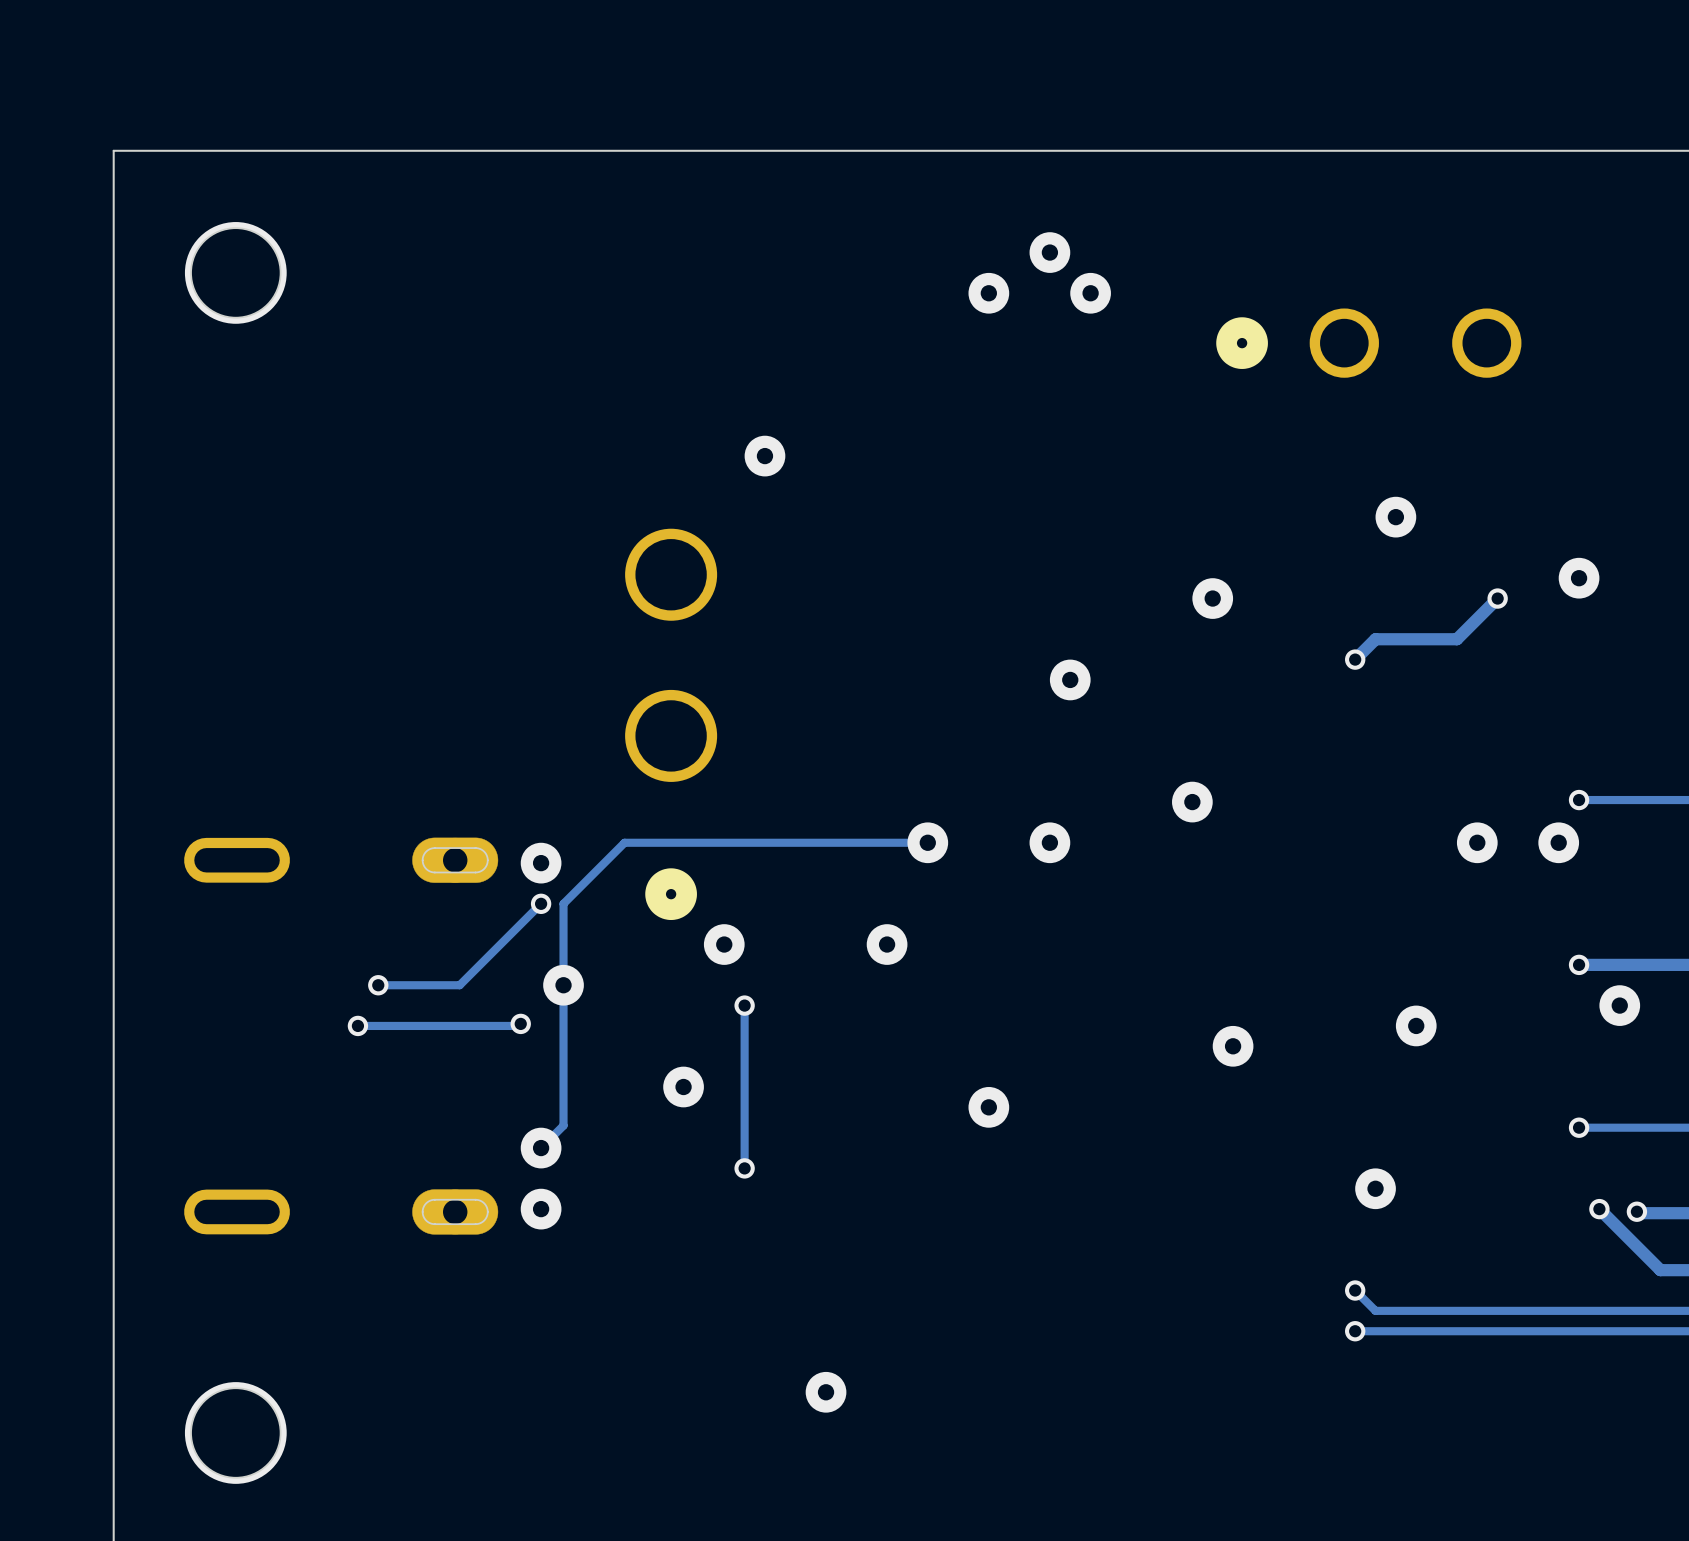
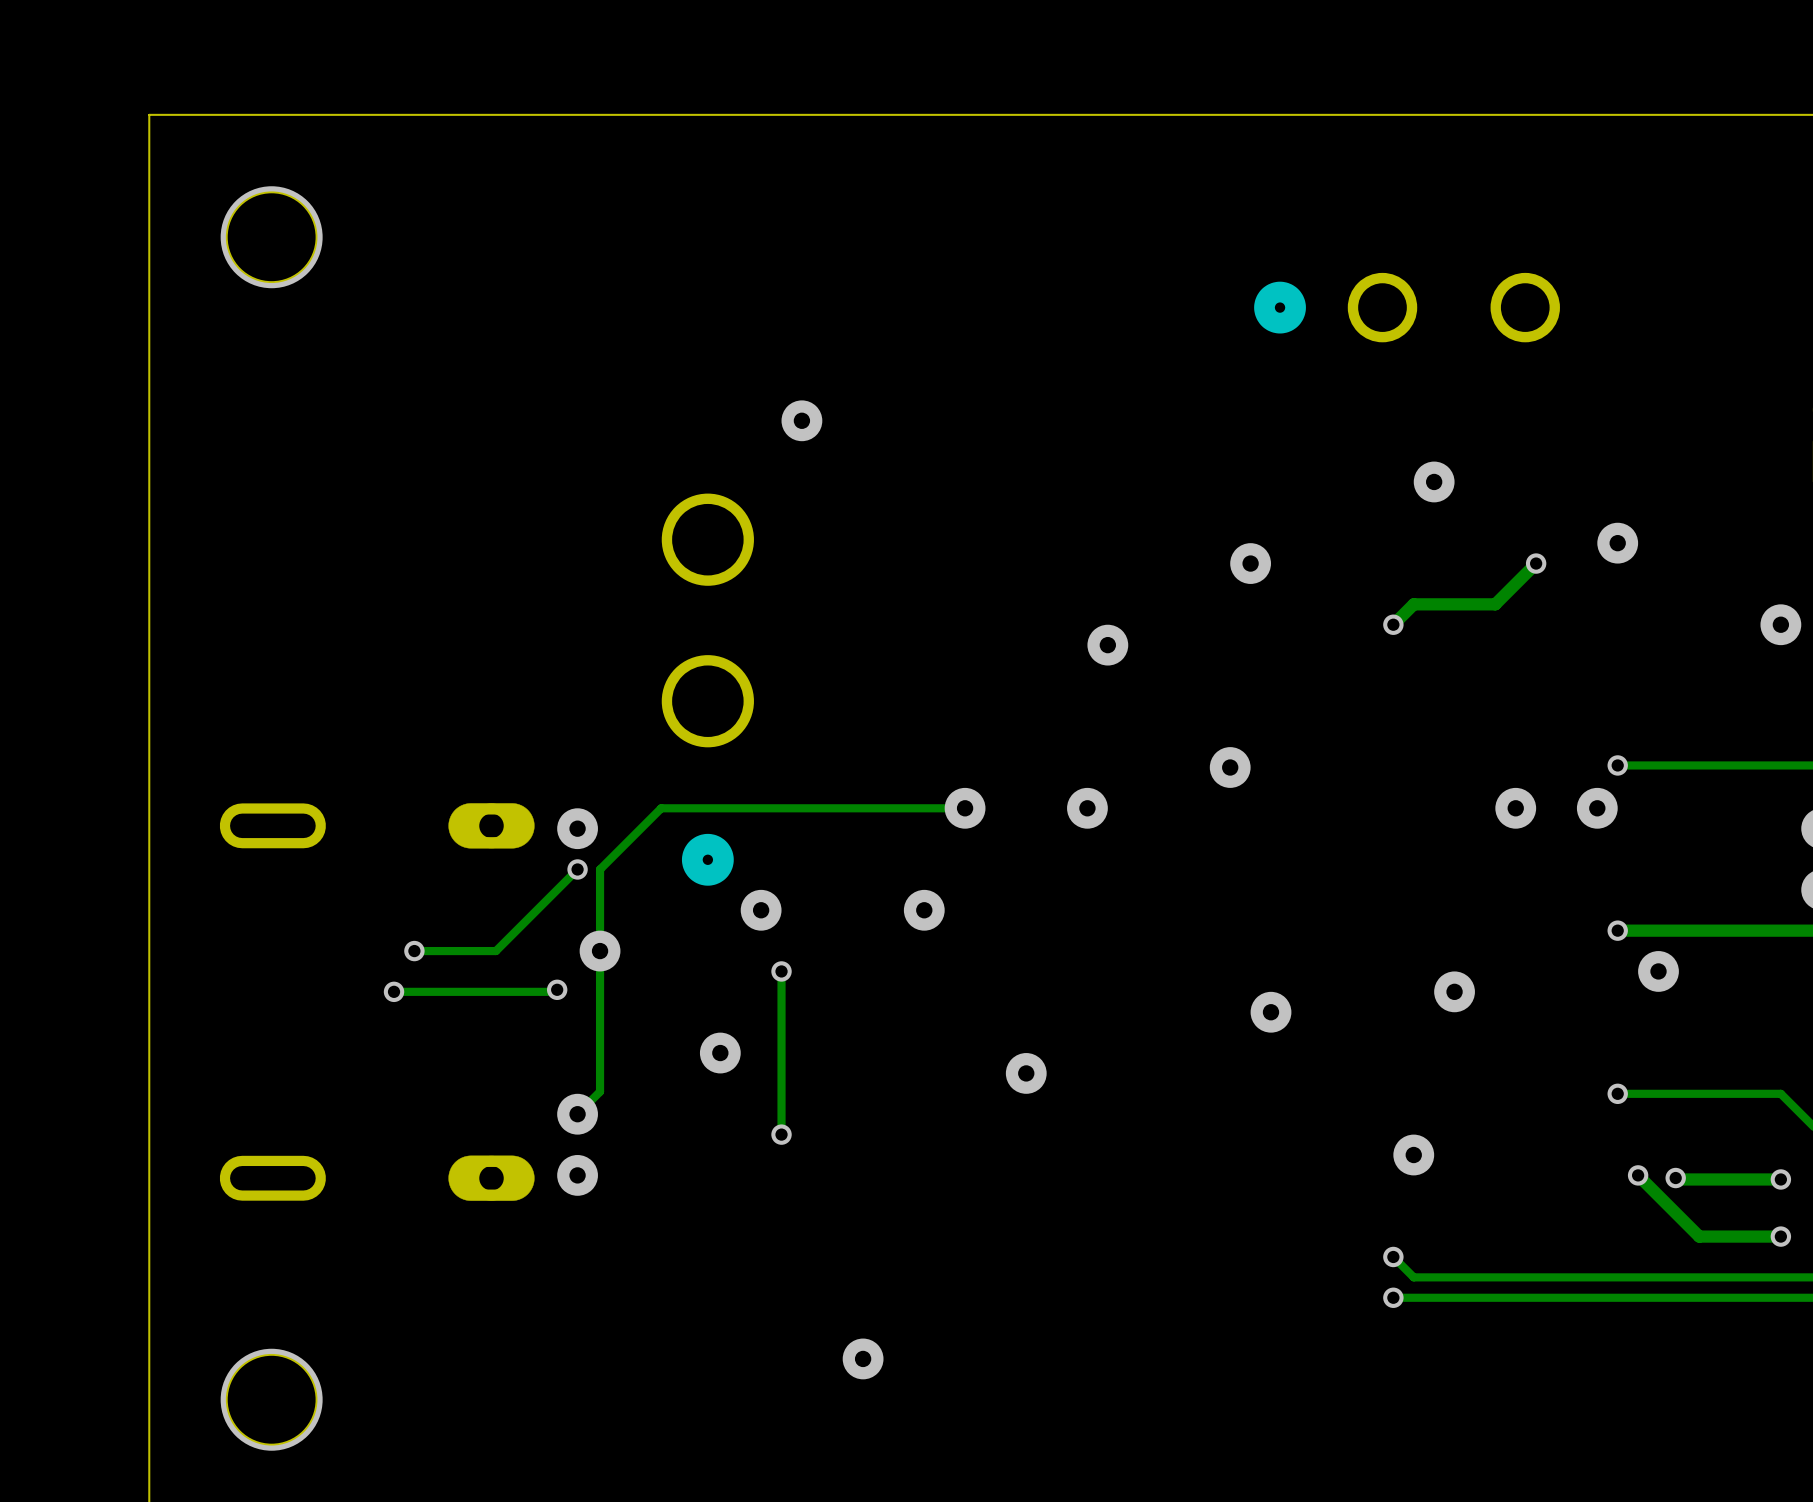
via: (1049, 252) -> none
via: (988, 293) -> none
via: (1090, 293) -> none

